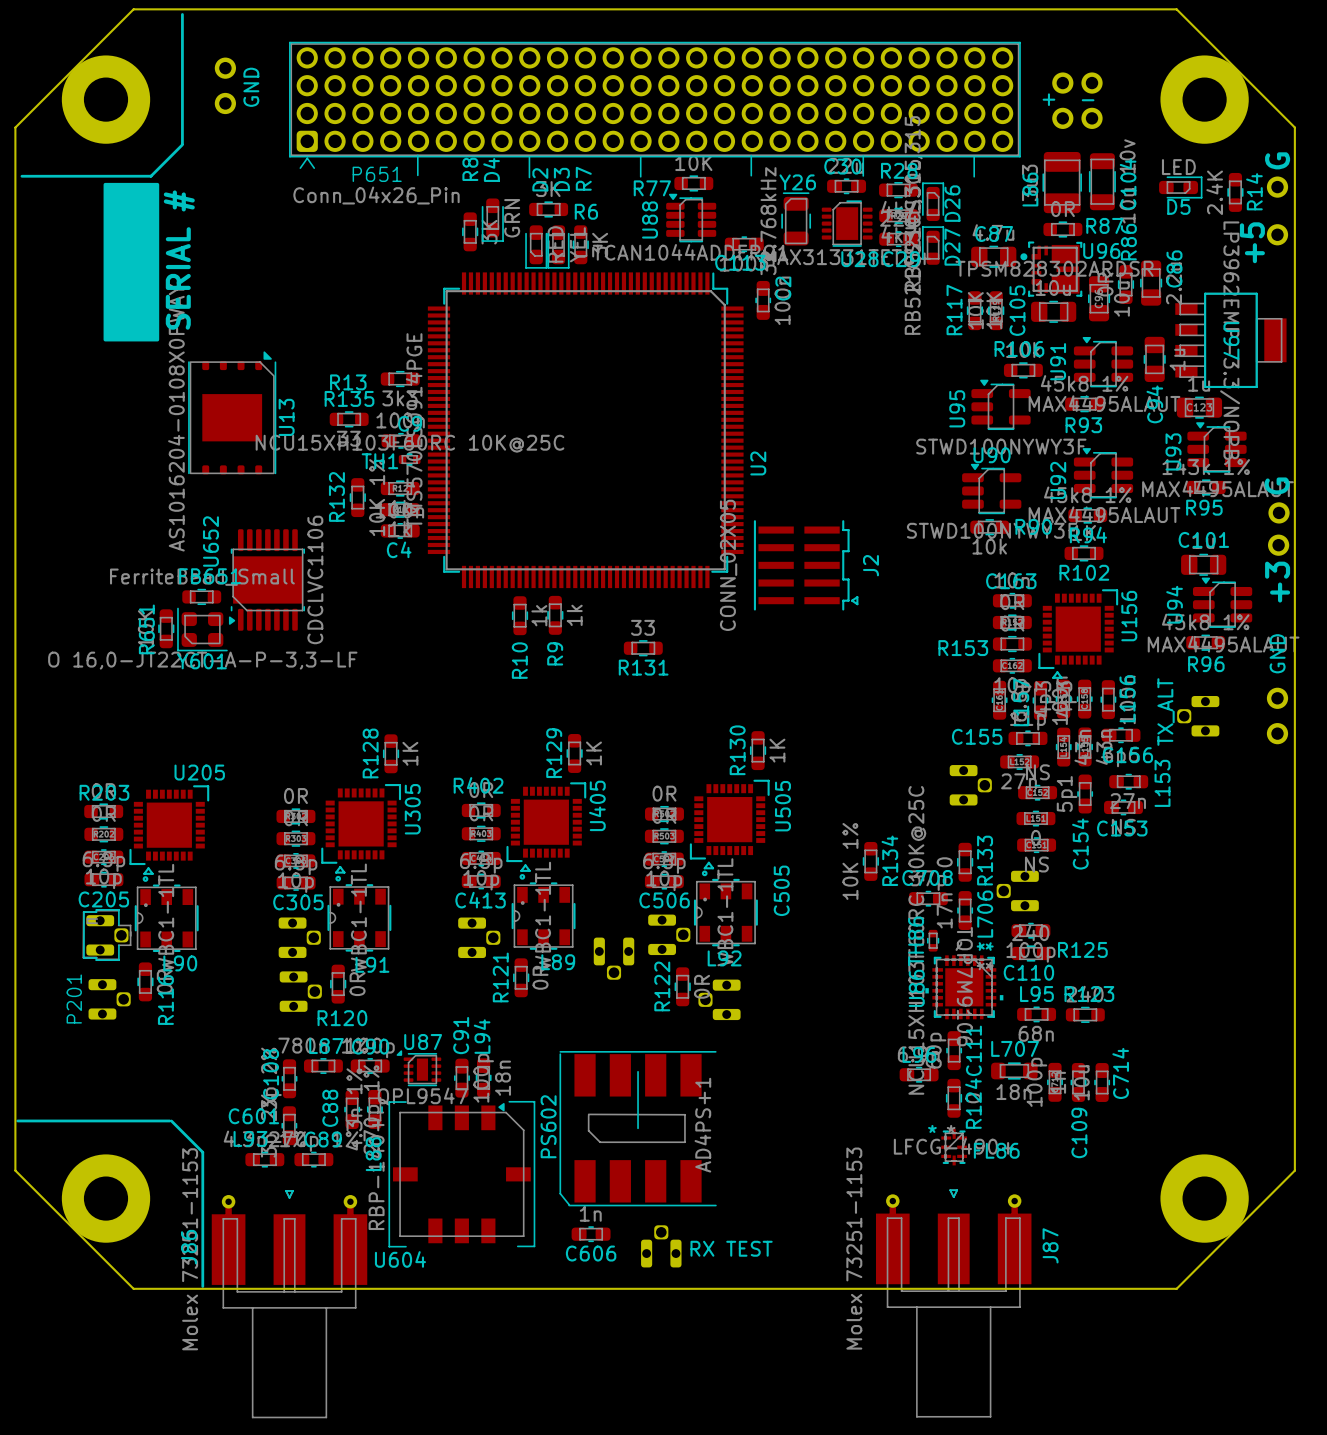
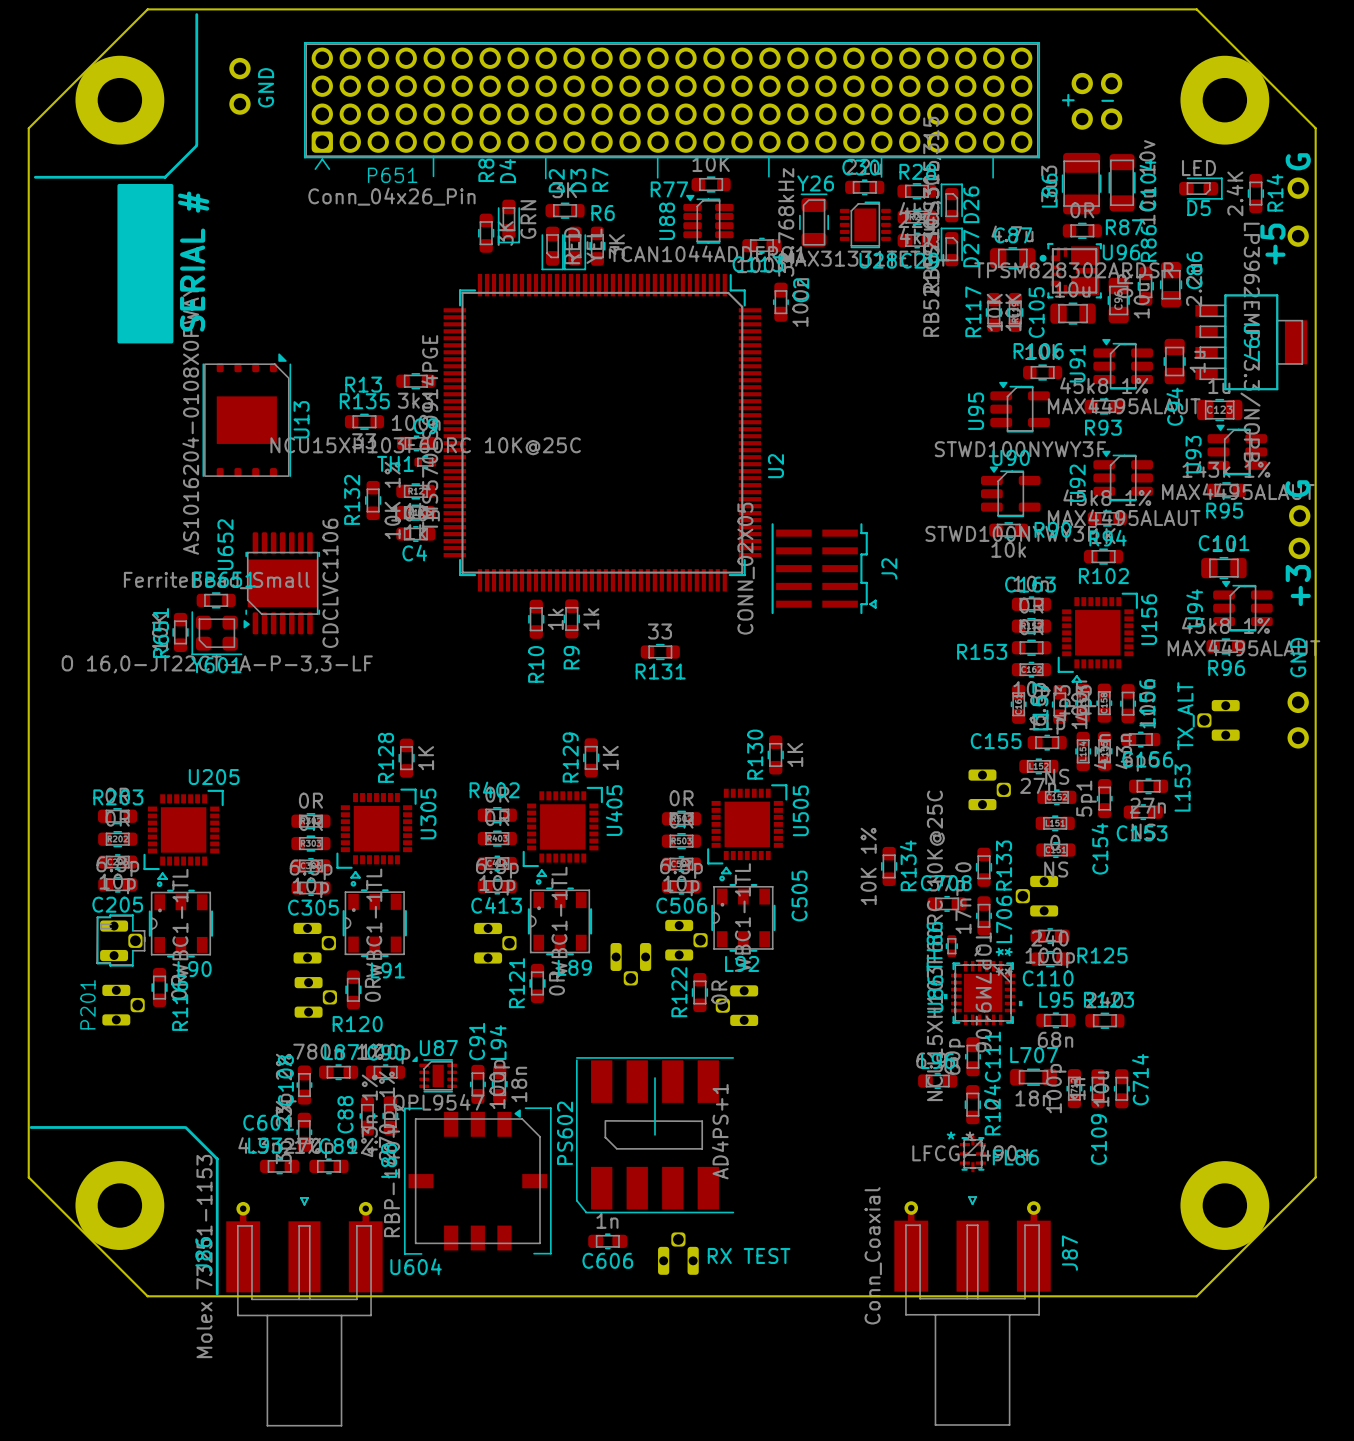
J87 value: Molex 73251-1153 (854, 1248) -> Conn_Coaxial (873, 1255)

